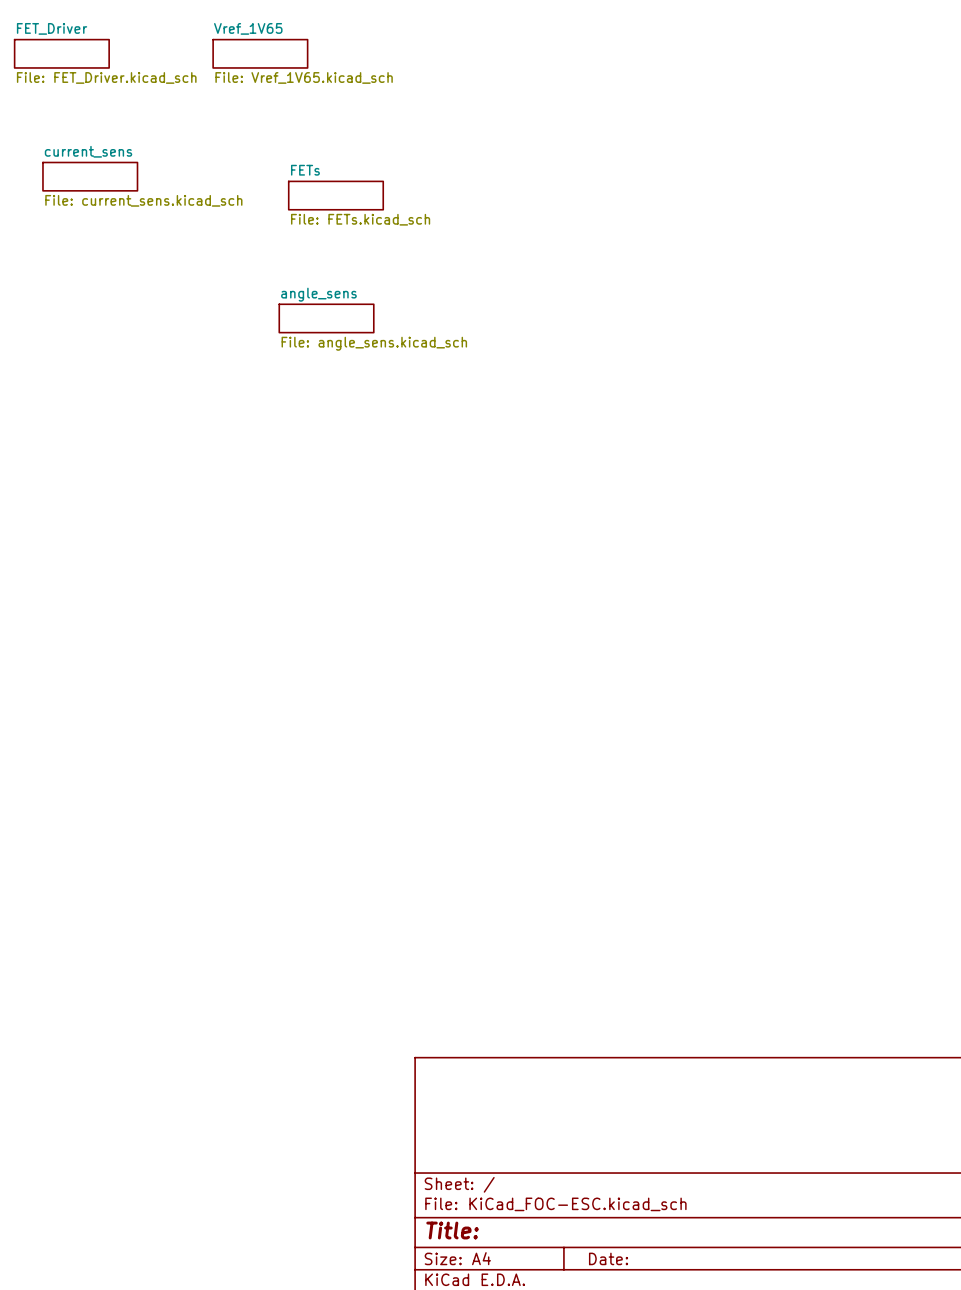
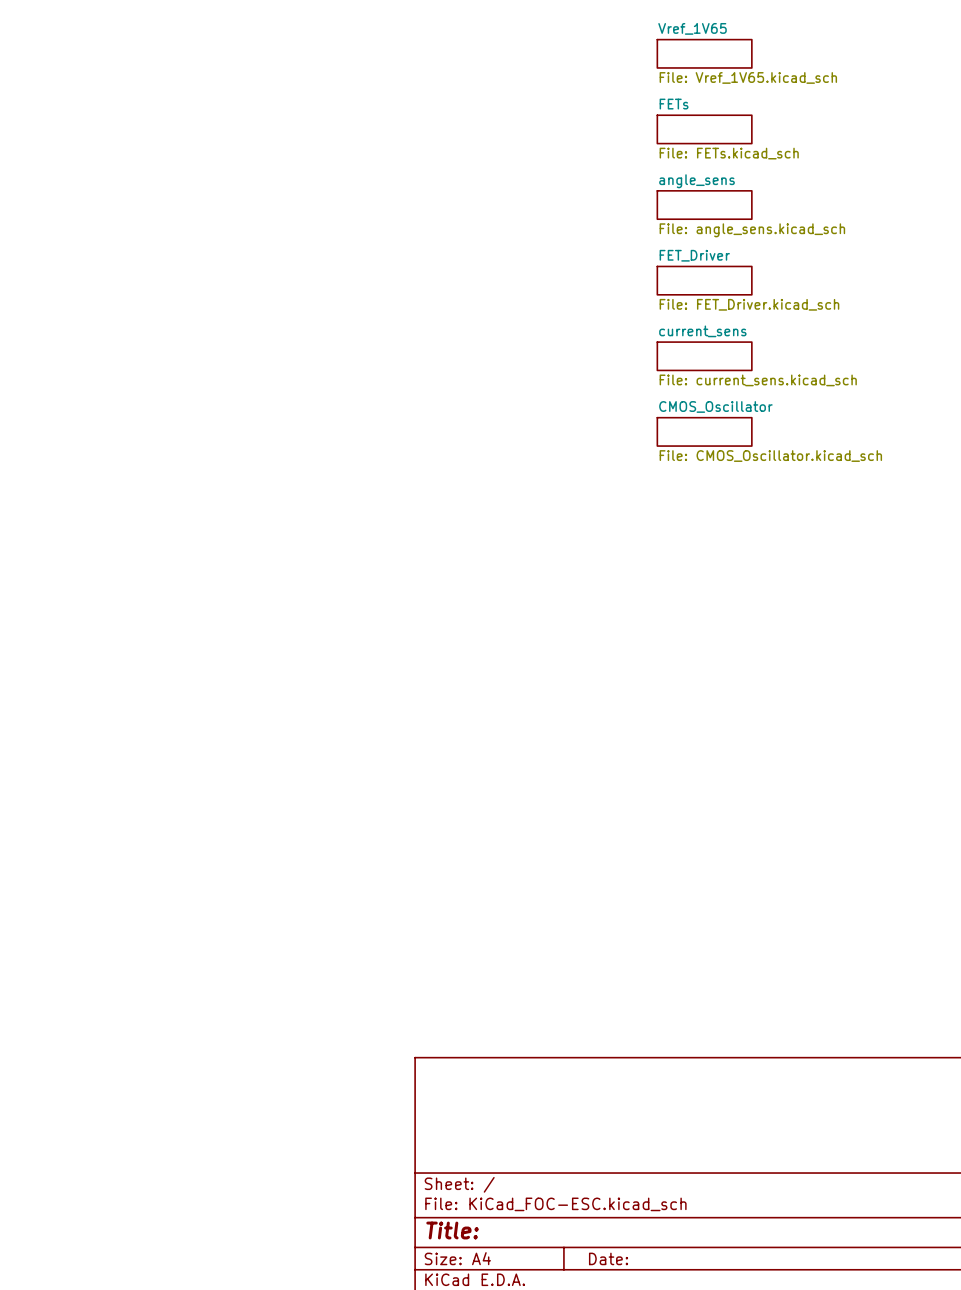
sheet FET_Driver: File: FET_Driver.kicad_sch (61, 53) -> none
sheet Vref_1V65 position: (260, 53) -> (704, 53)
sheet FETs: none -> File: FETs.kicad_sch (704, 129)
sheet current_sens: File: current_sens.kicad_sch (90, 176) -> none
sheet FETs: File: FETs.kicad_sch (335, 195) -> none
sheet angle_sens: none -> File: angle_sens.kicad_sch (704, 205)
sheet FET_Driver: none -> File: FET_Driver.kicad_sch (704, 280)
sheet angle_sens: File: angle_sens.kicad_sch (326, 318) -> none
sheet current_sens: none -> File: current_sens.kicad_sch (704, 356)
sheet CMOS_Oscillator: none -> File: CMOS_Oscillator.kicad_sch (704, 431)

